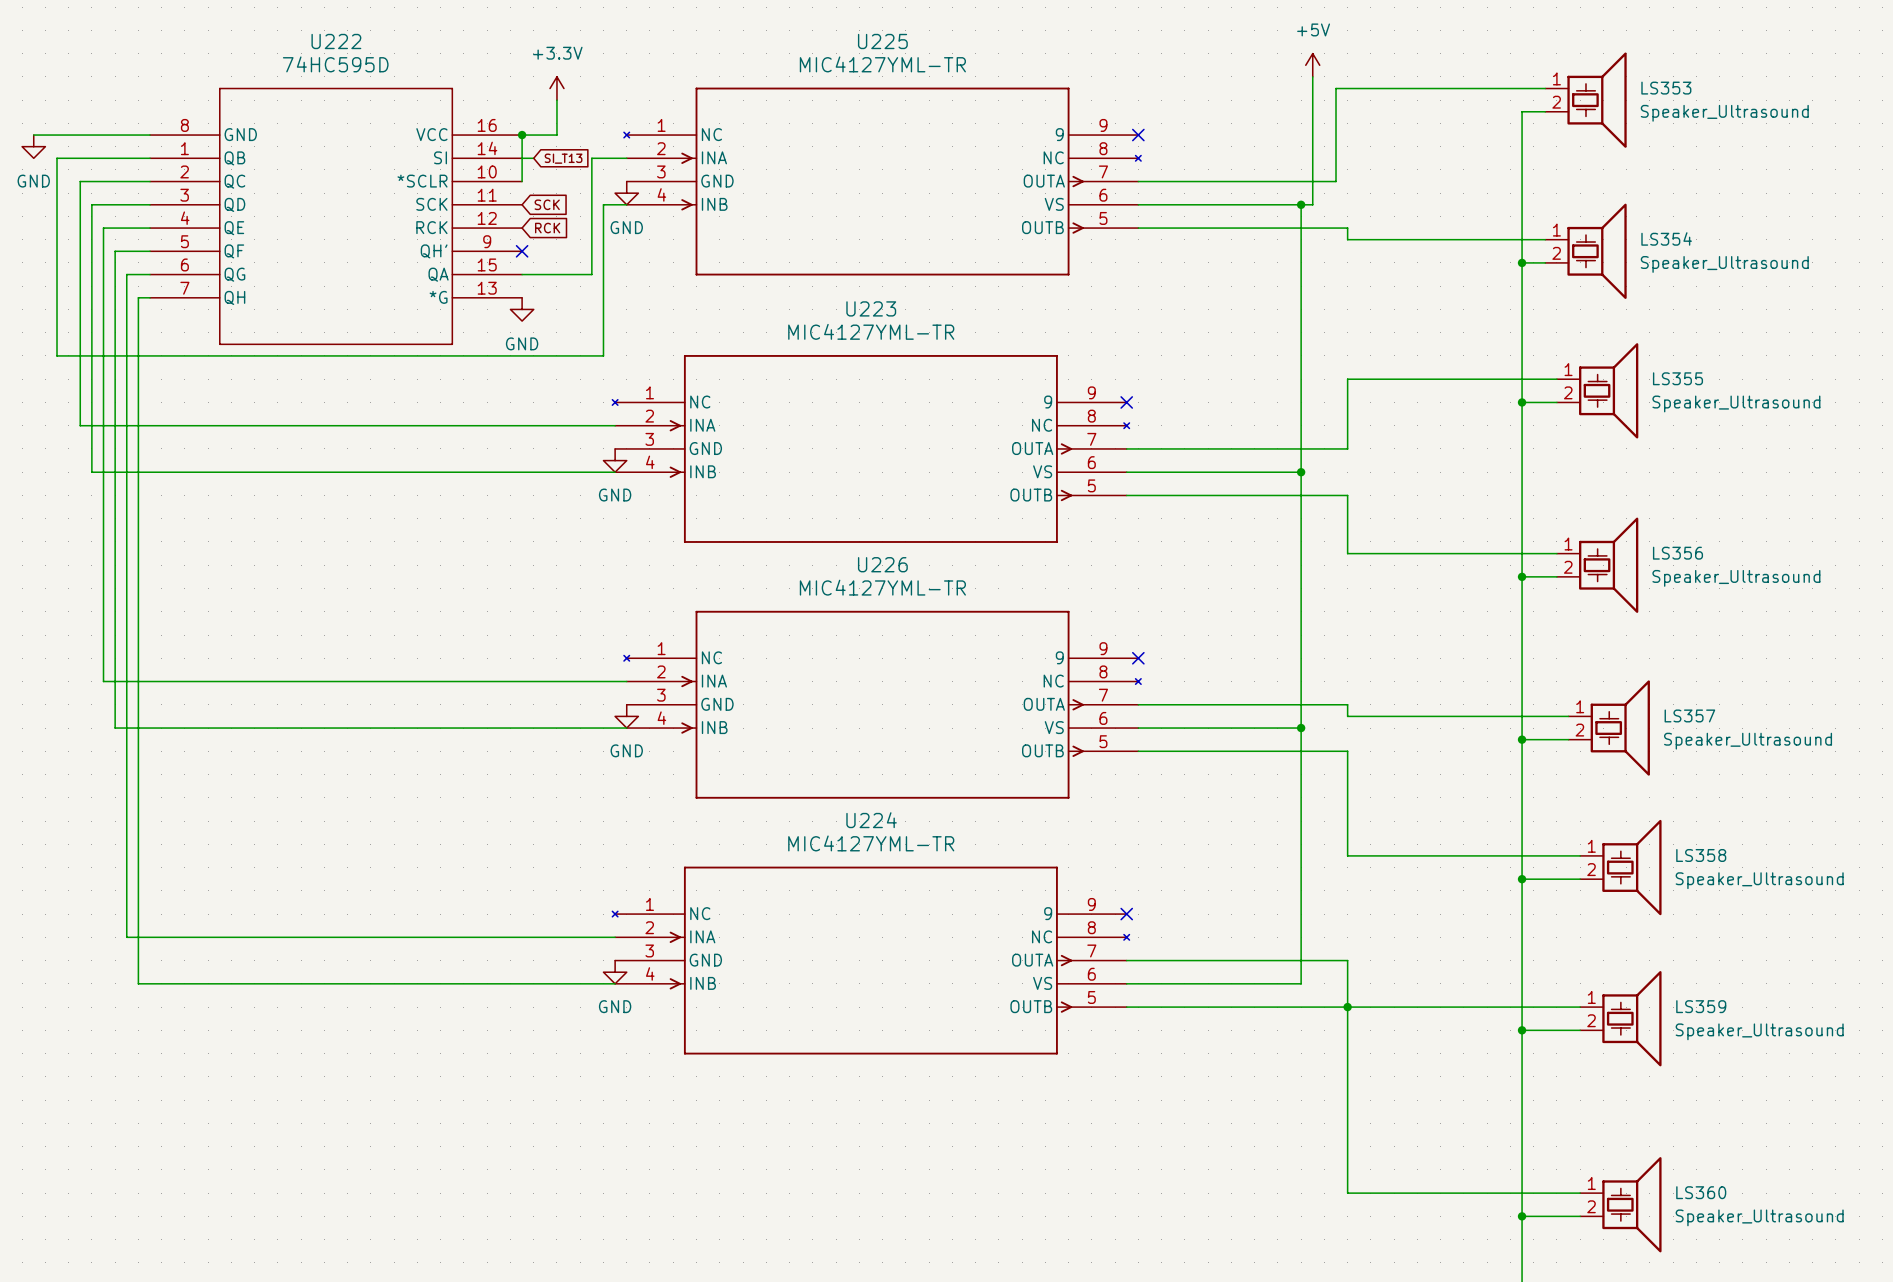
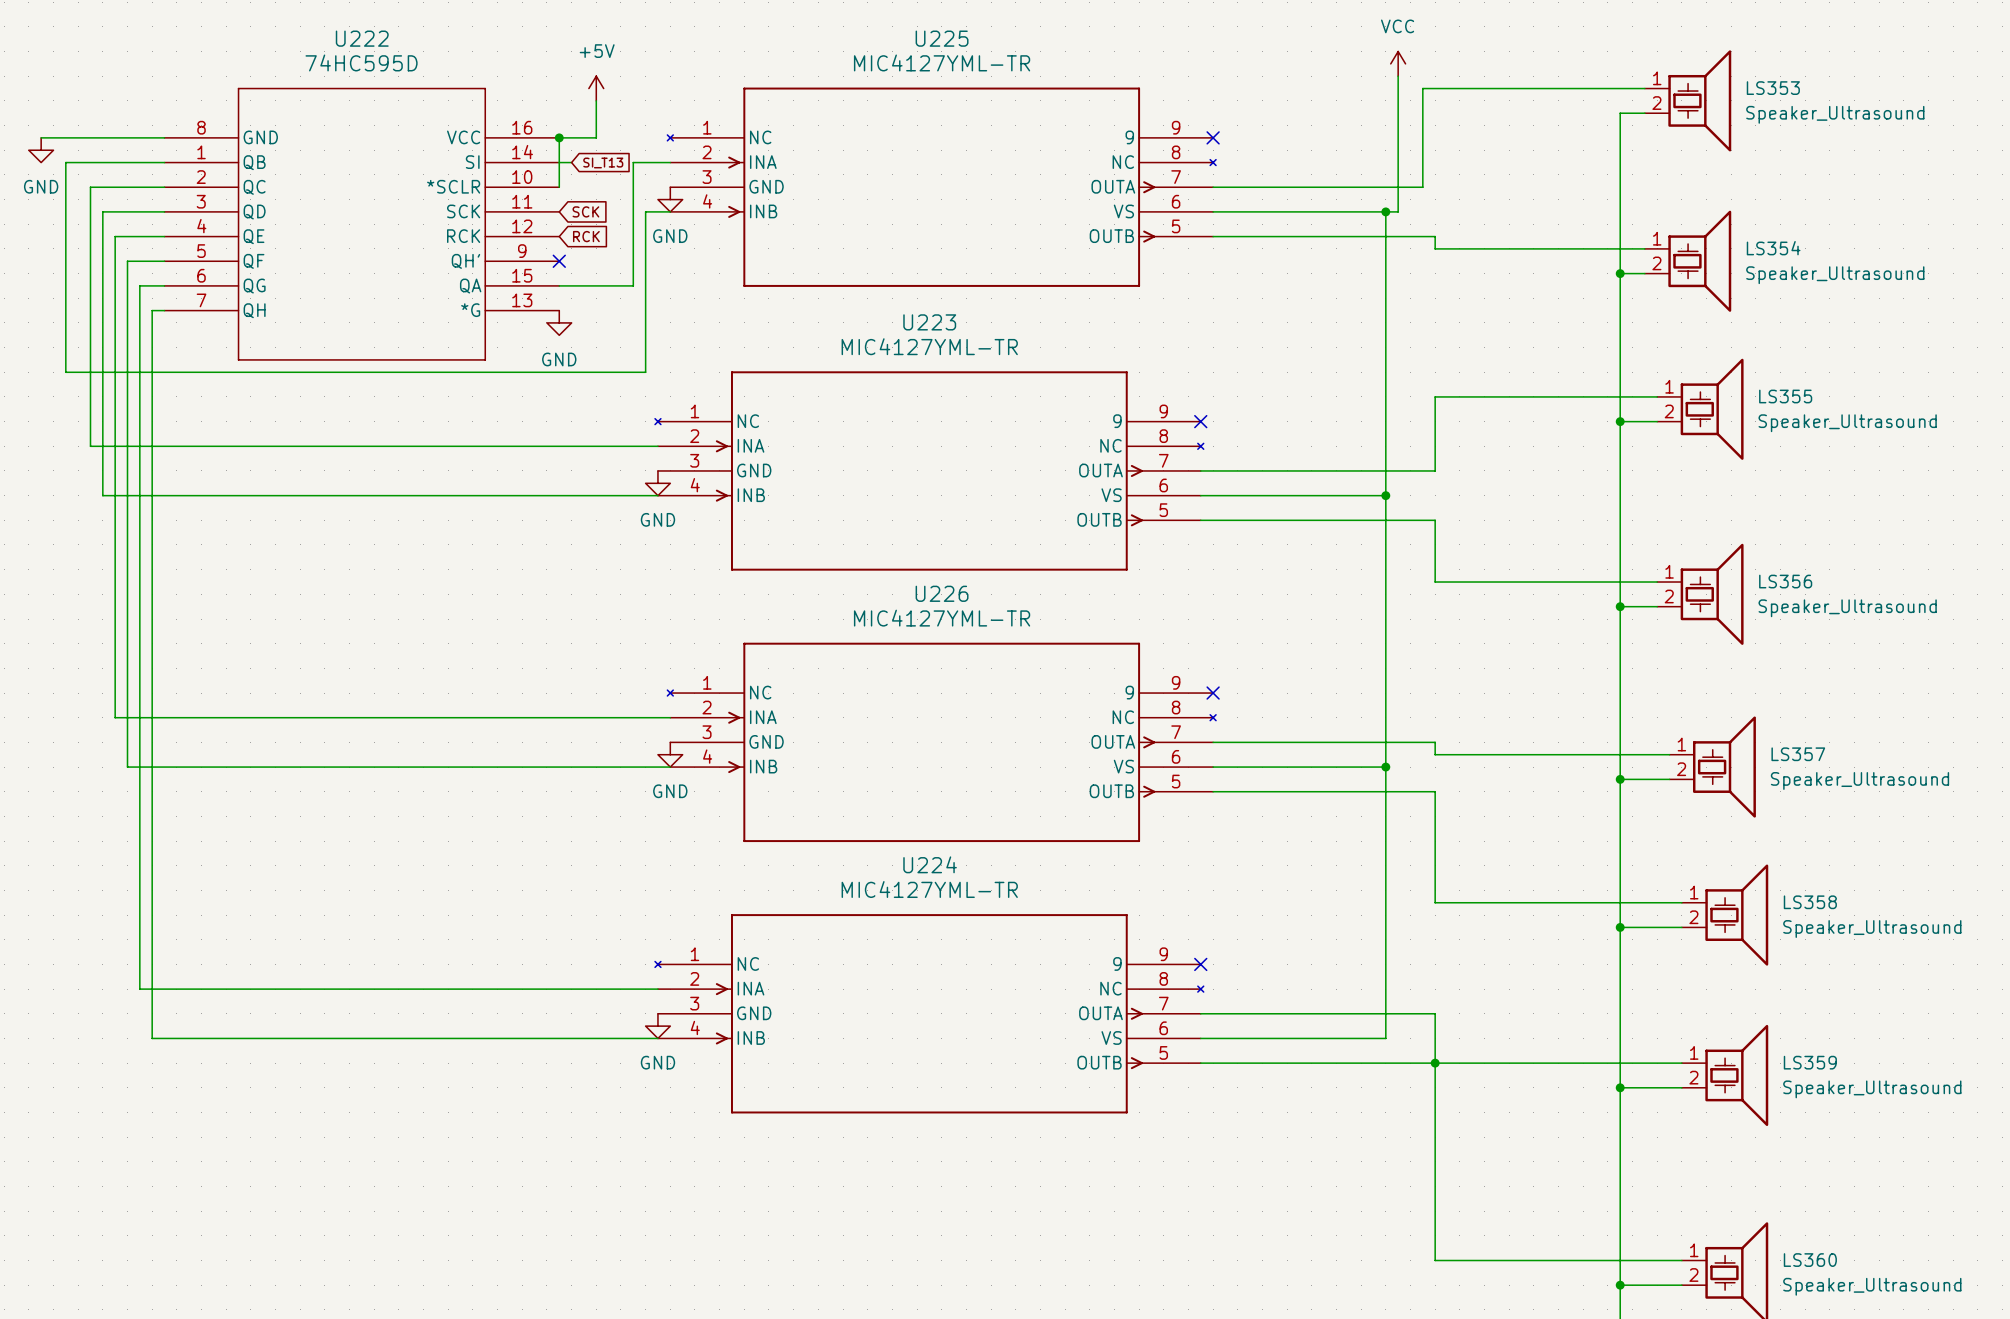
power symbol: +5V (1312, 65) -> VCC (1398, 63)
power symbol: +3.3V (556, 88) -> +5V (596, 88)

